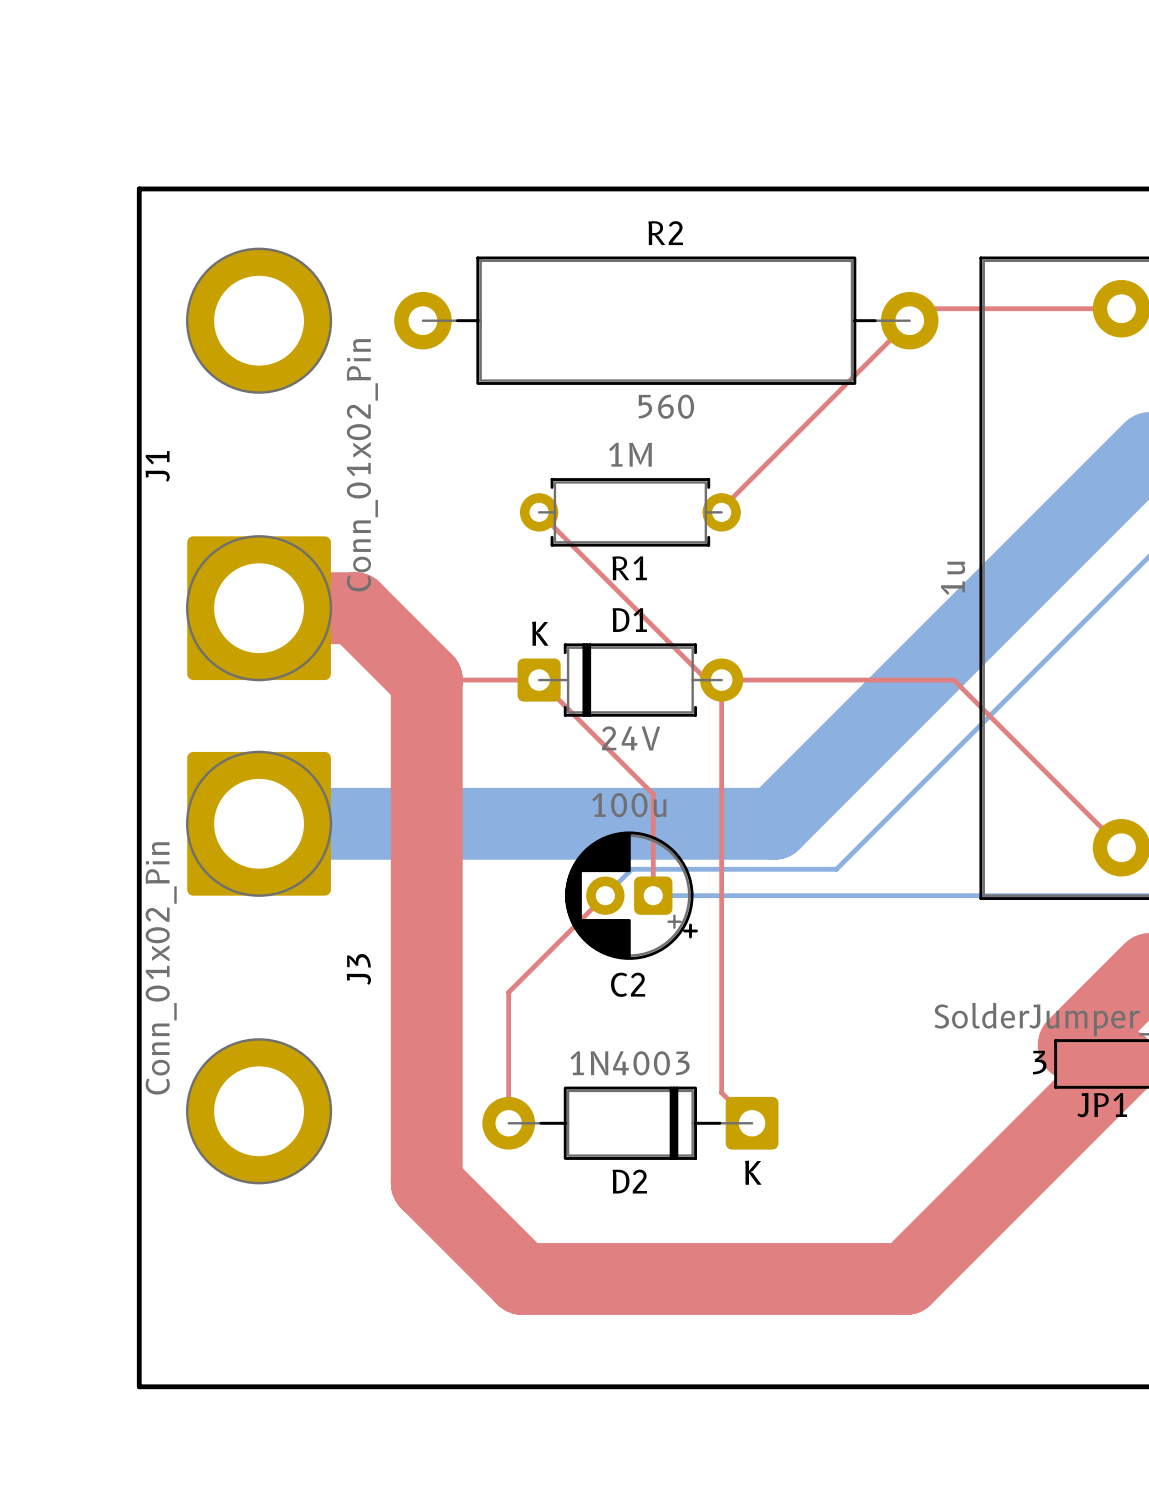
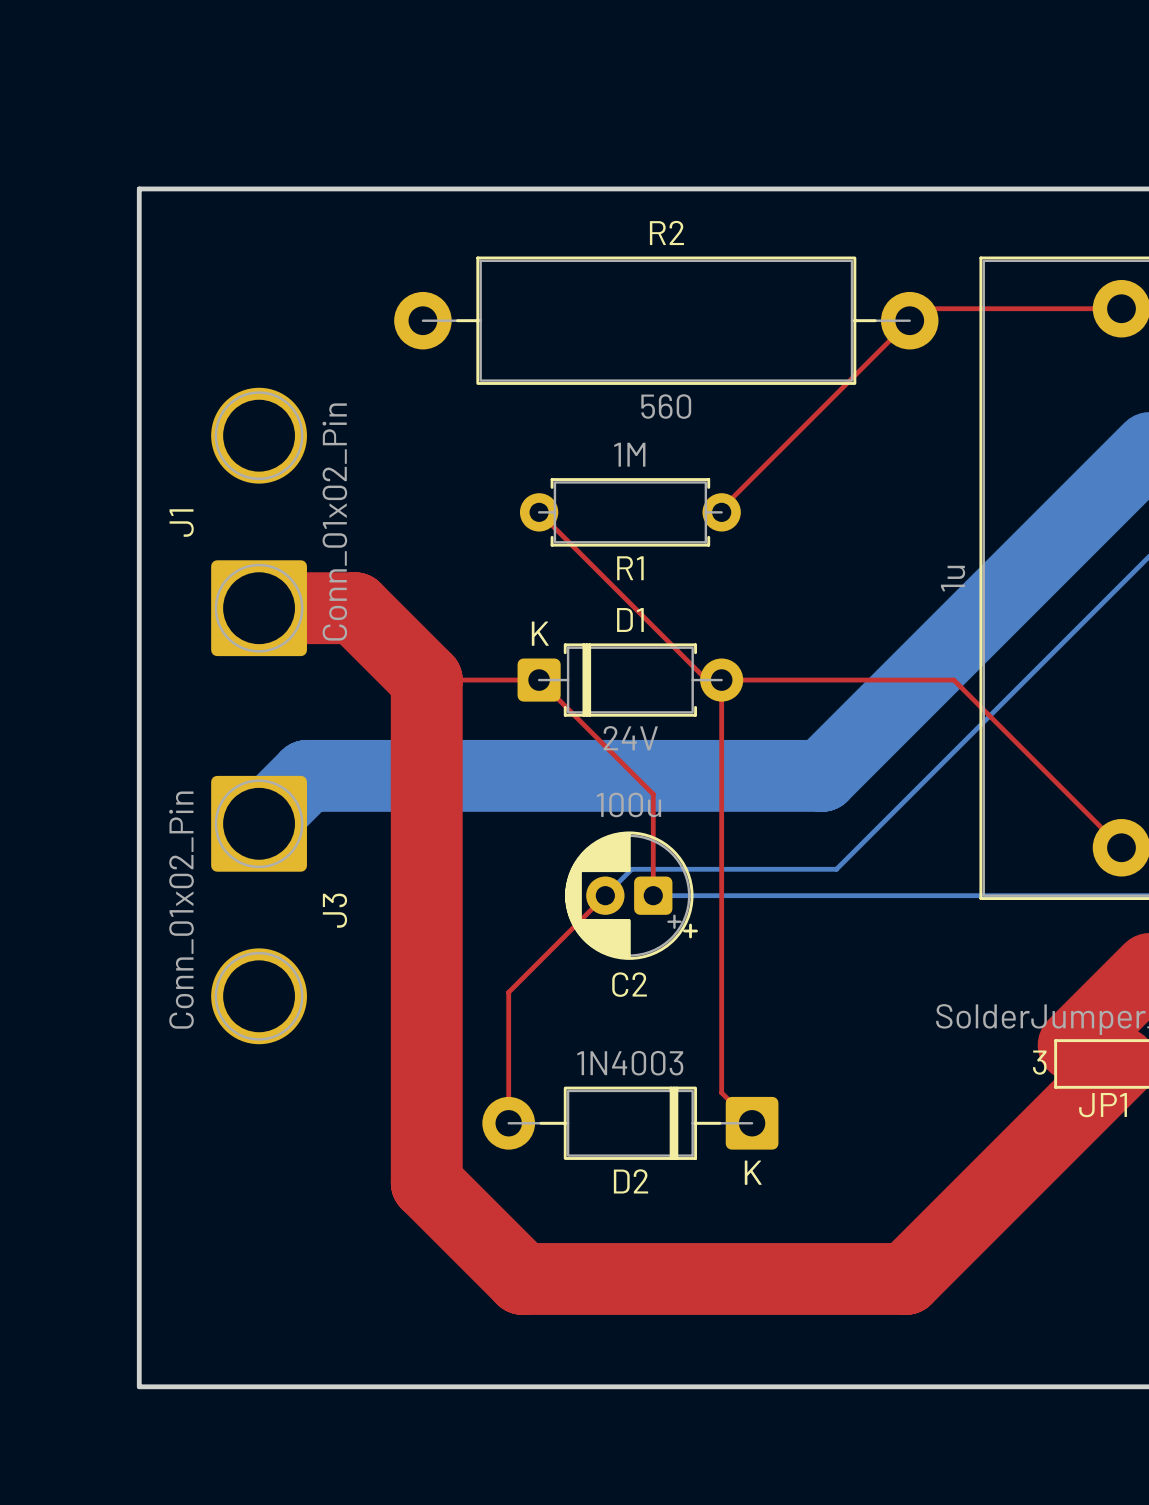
J1 footprint: [185, 247, 333, 682] -> [211, 387, 307, 657]
J3 footprint: [185, 750, 333, 1185] -> [211, 775, 307, 1045]
bottom track: (822, 775) (774, 823) (259, 823) -> (822, 775) (306, 775) (259, 823)

